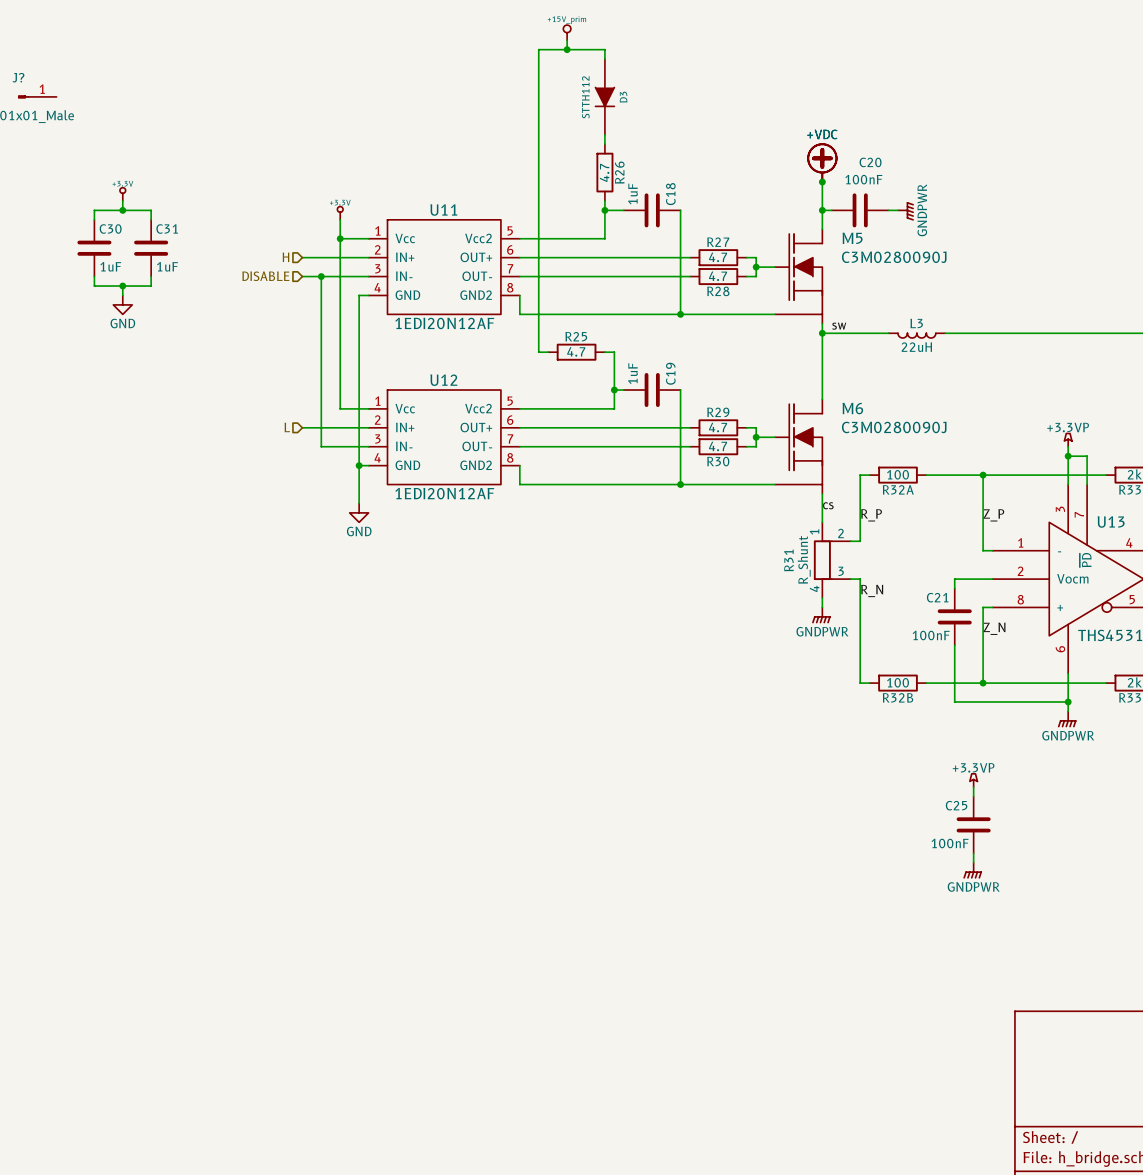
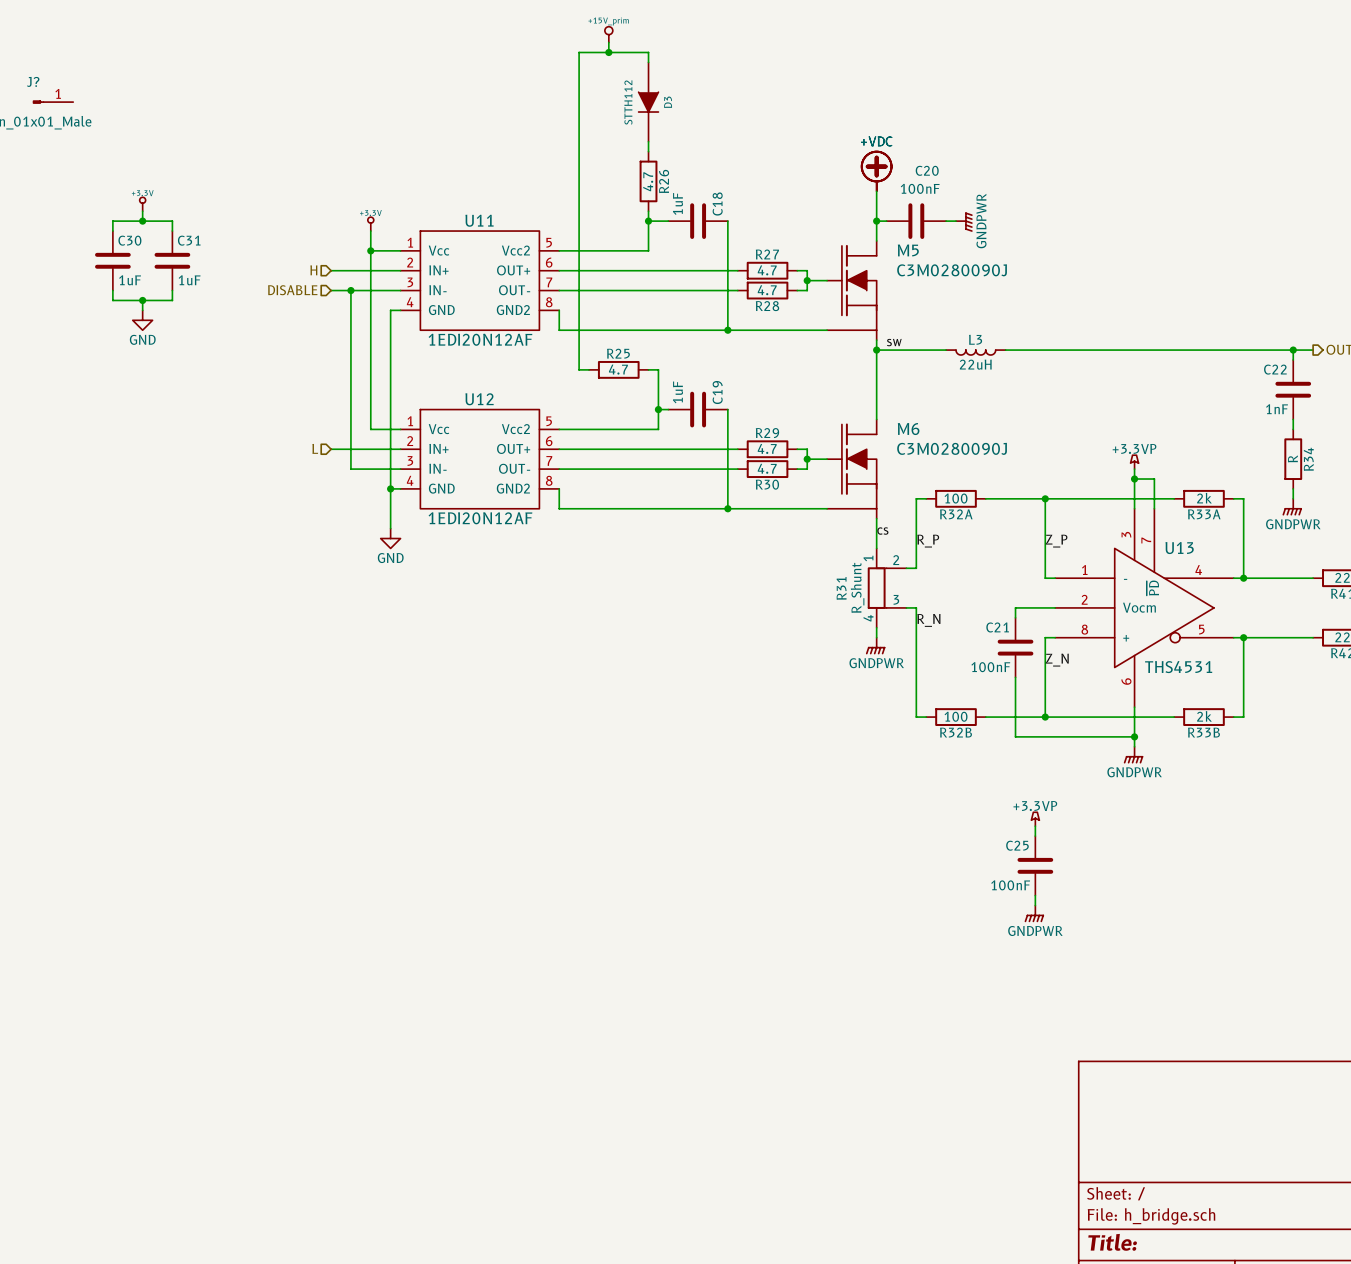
junction: (822, 182) -> none

